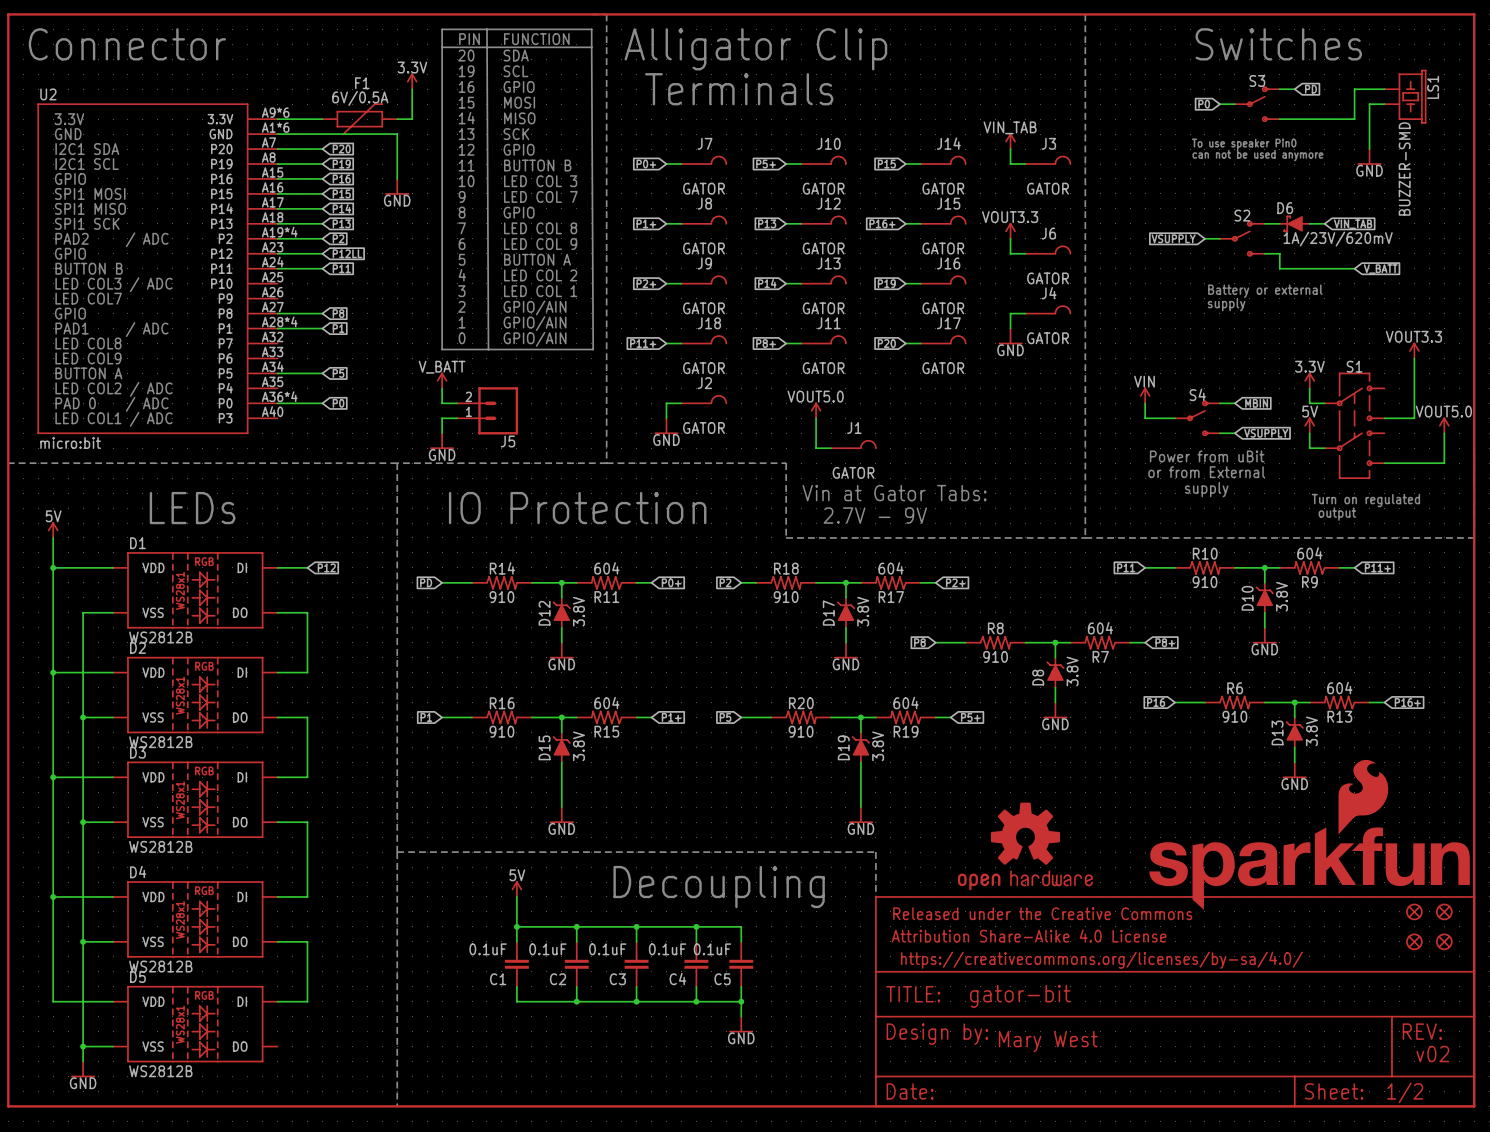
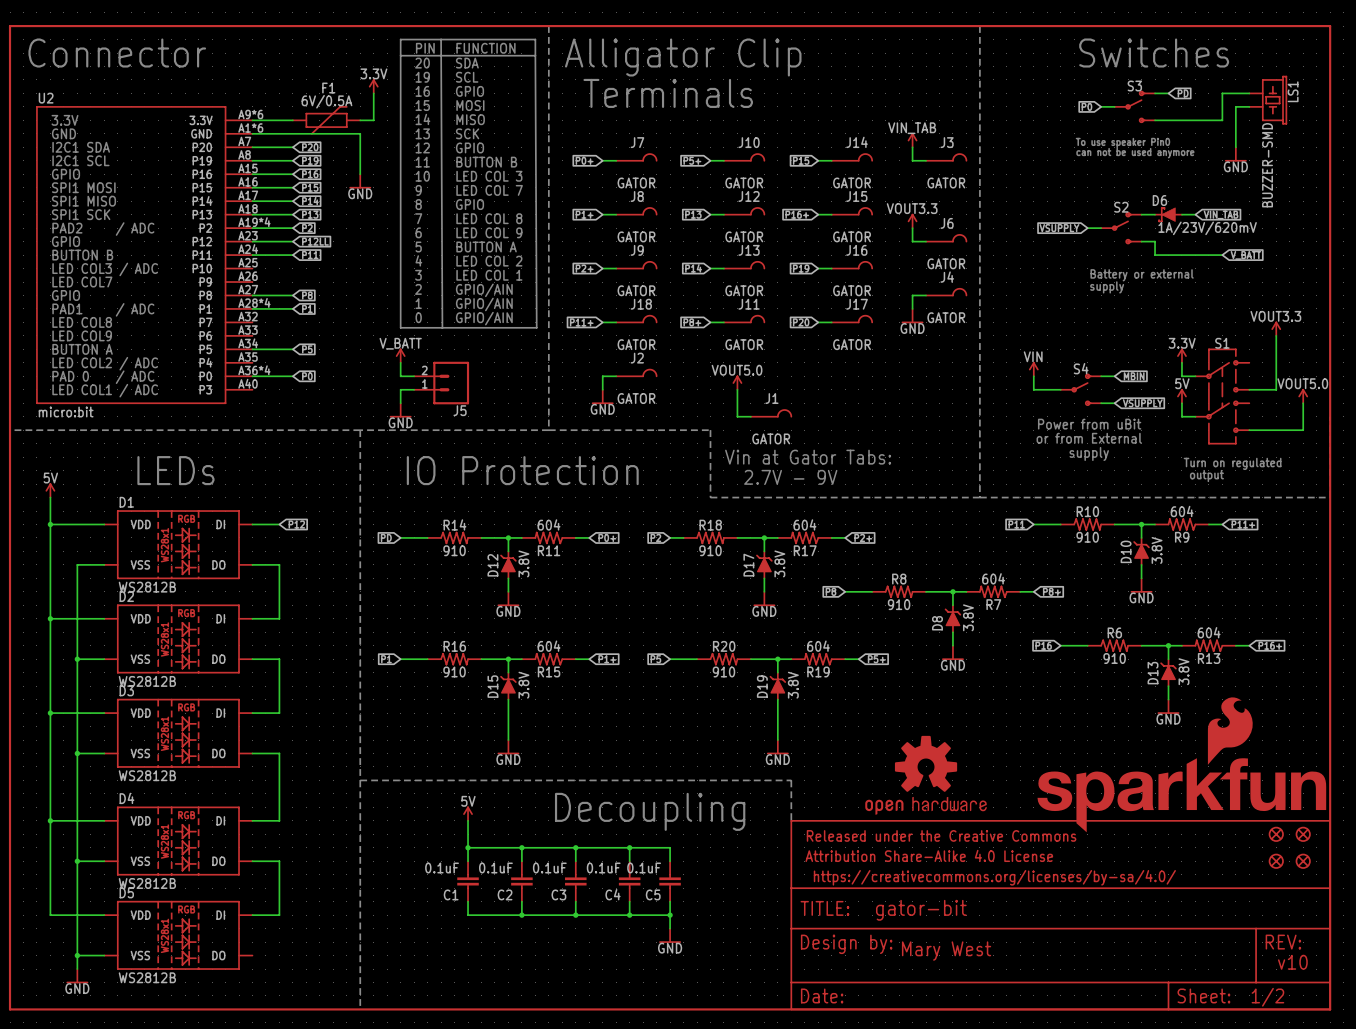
text: v02 (1432, 1054) -> v10 (1292, 962)

